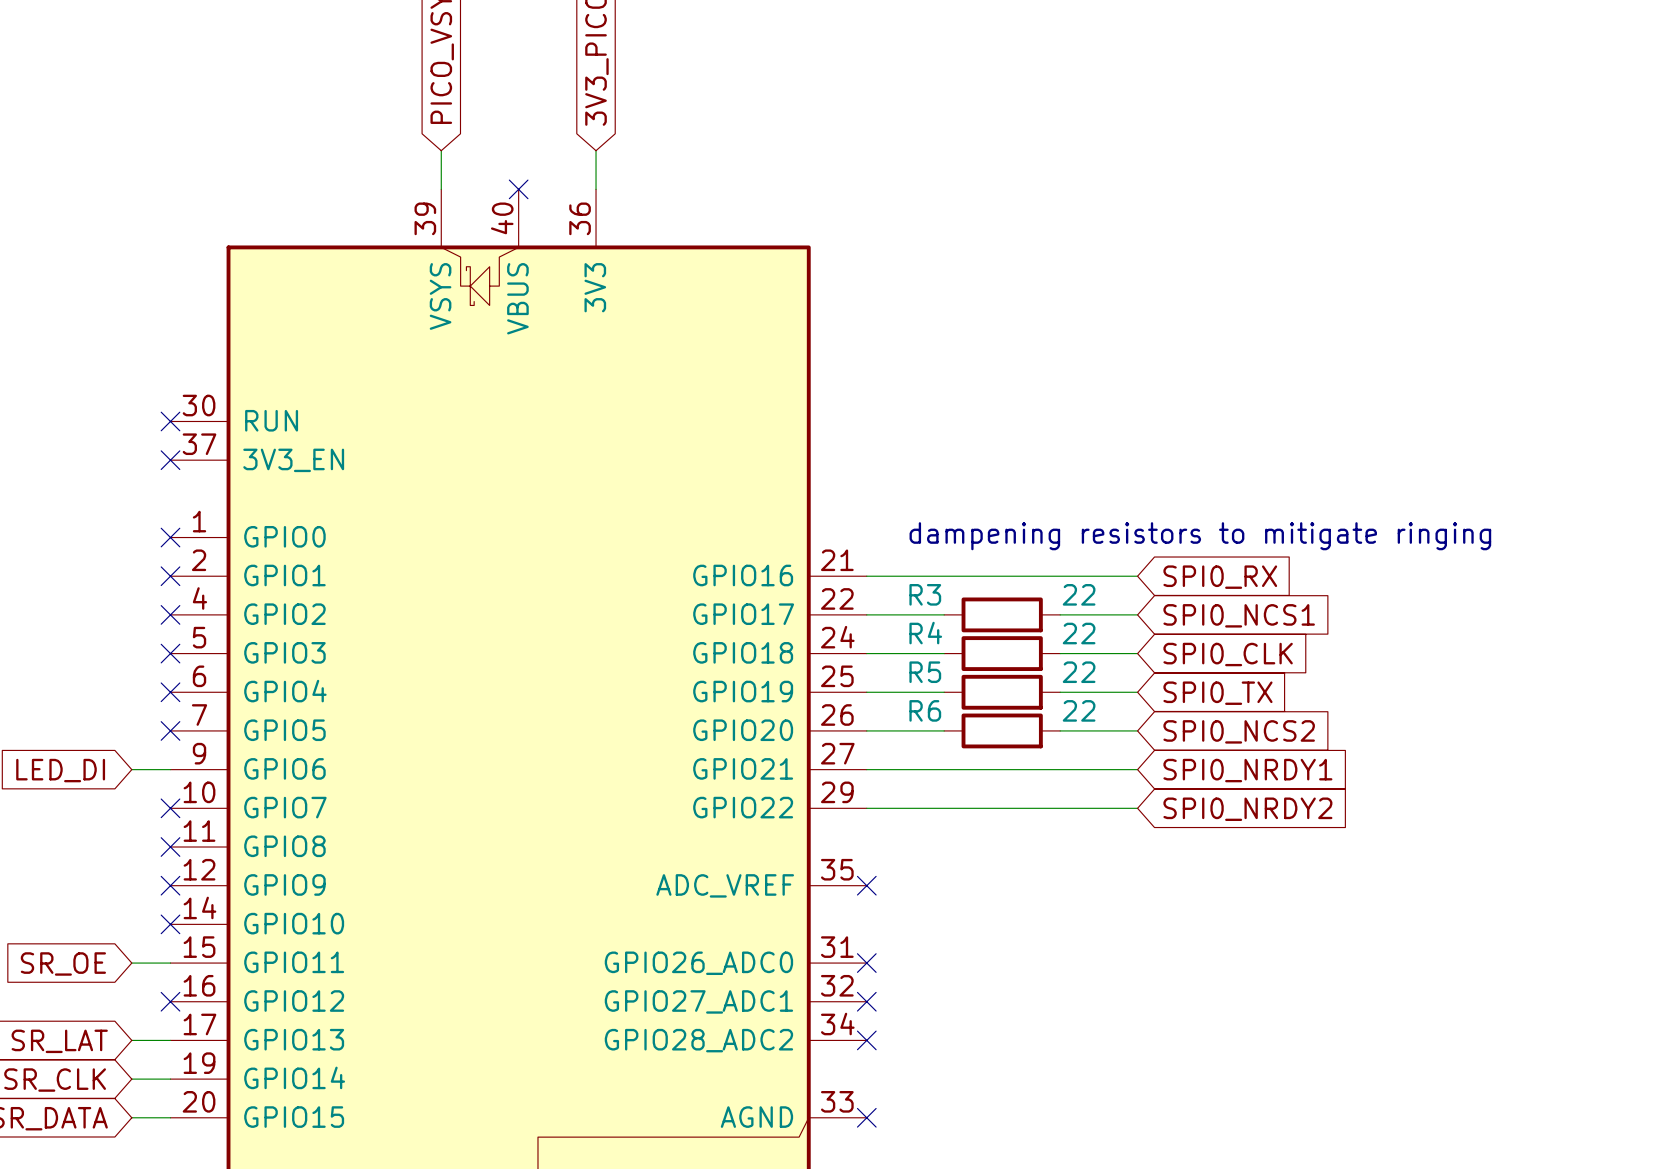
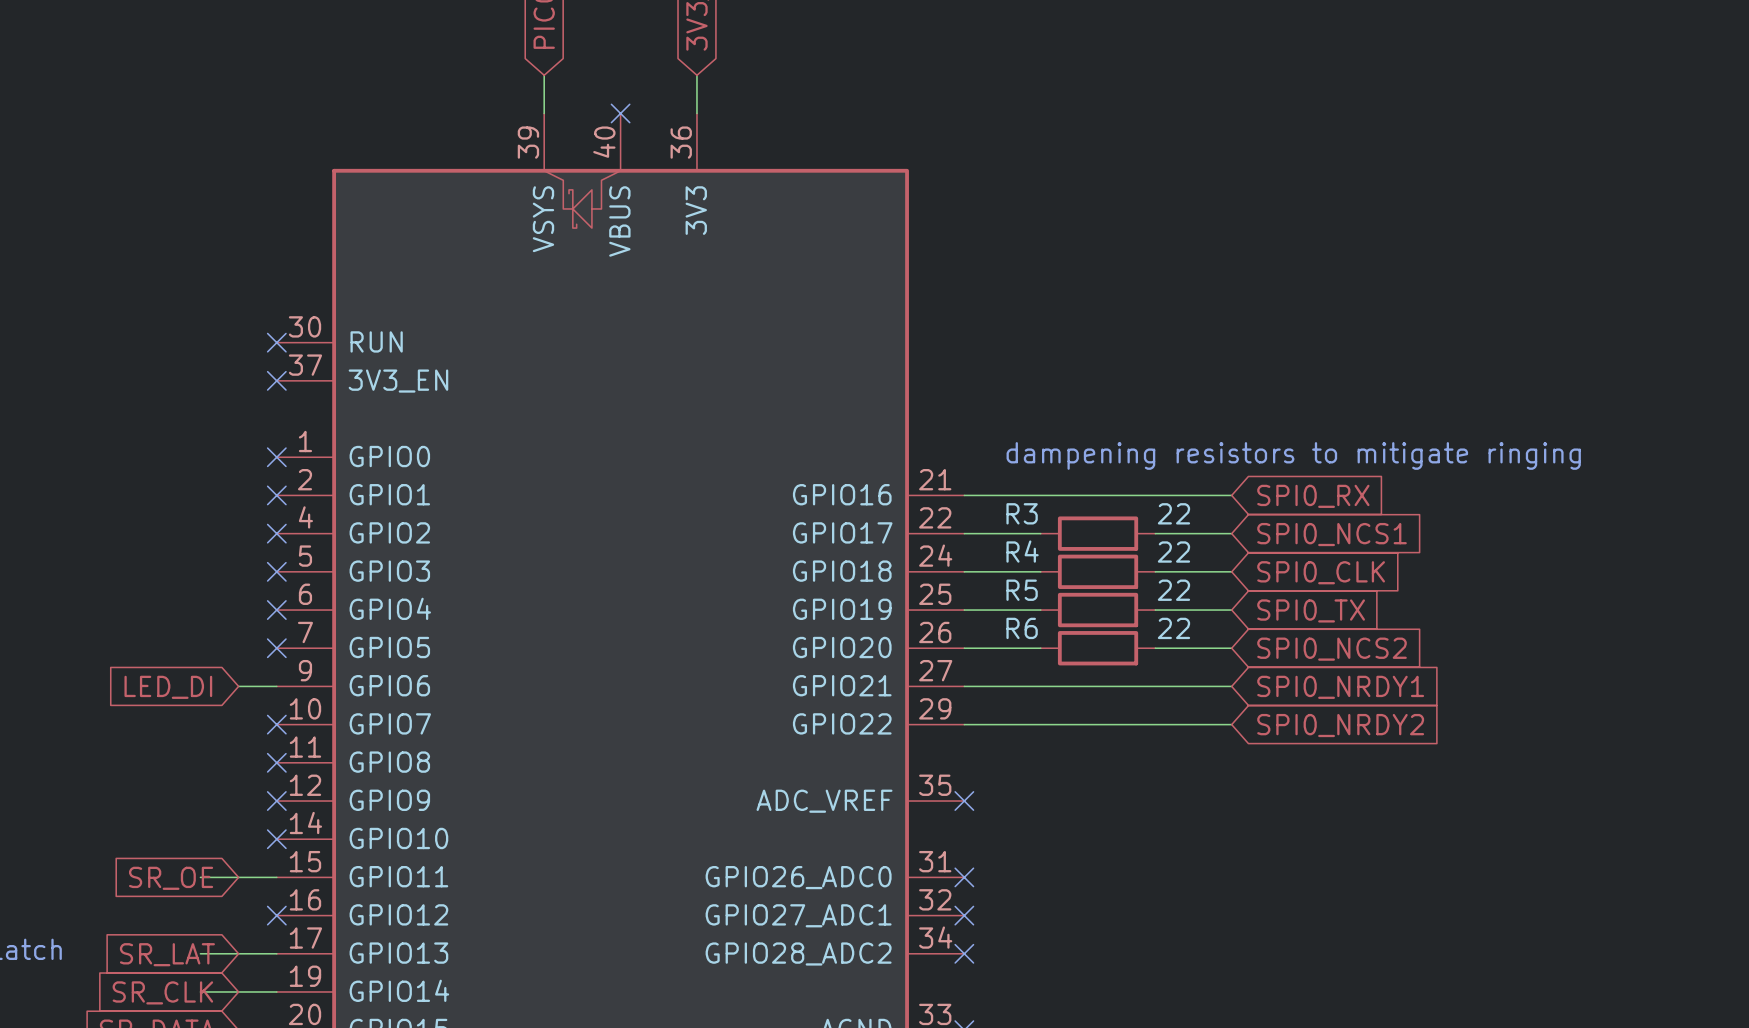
wire: none -> (200, 877) (238, 877)
wire: none -> (200, 953) (238, 953)
wire: none -> (200, 991) (238, 991)

